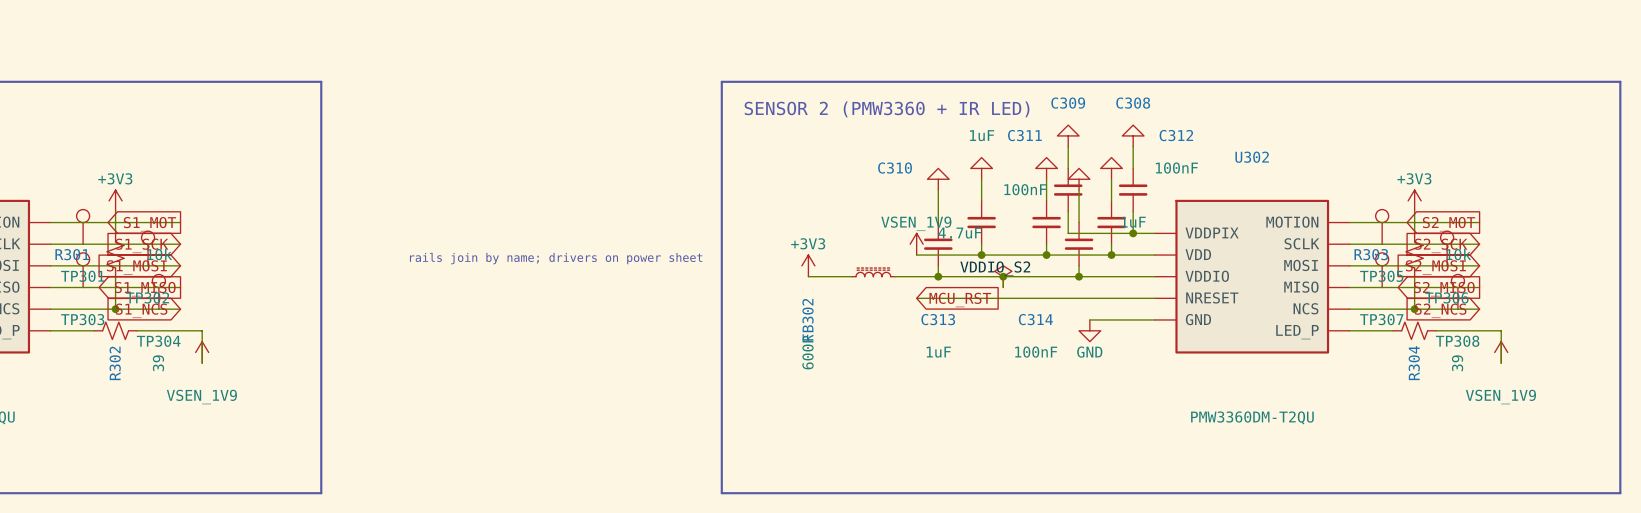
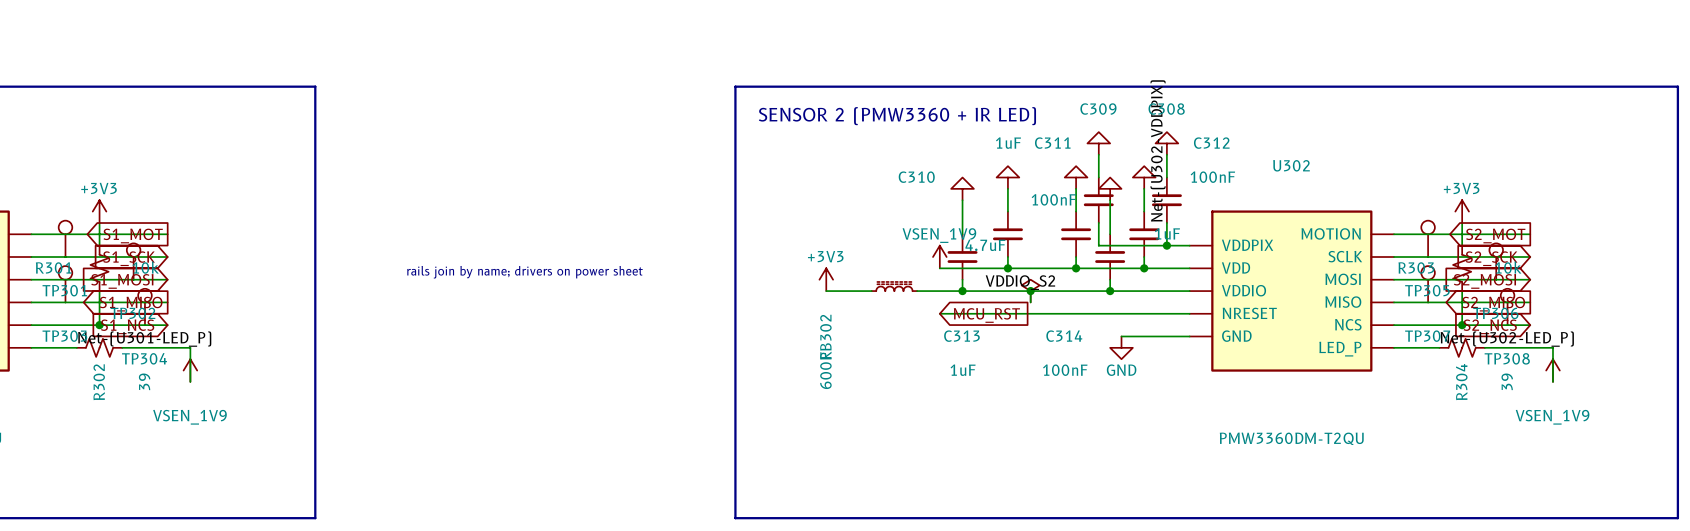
label: none -> Net-(U302-VDDPIX) (1158, 150)
label: none -> Net-(U301-LED_P) (144, 339)
label: none -> Net-(U302-LED_P) (1507, 339)

